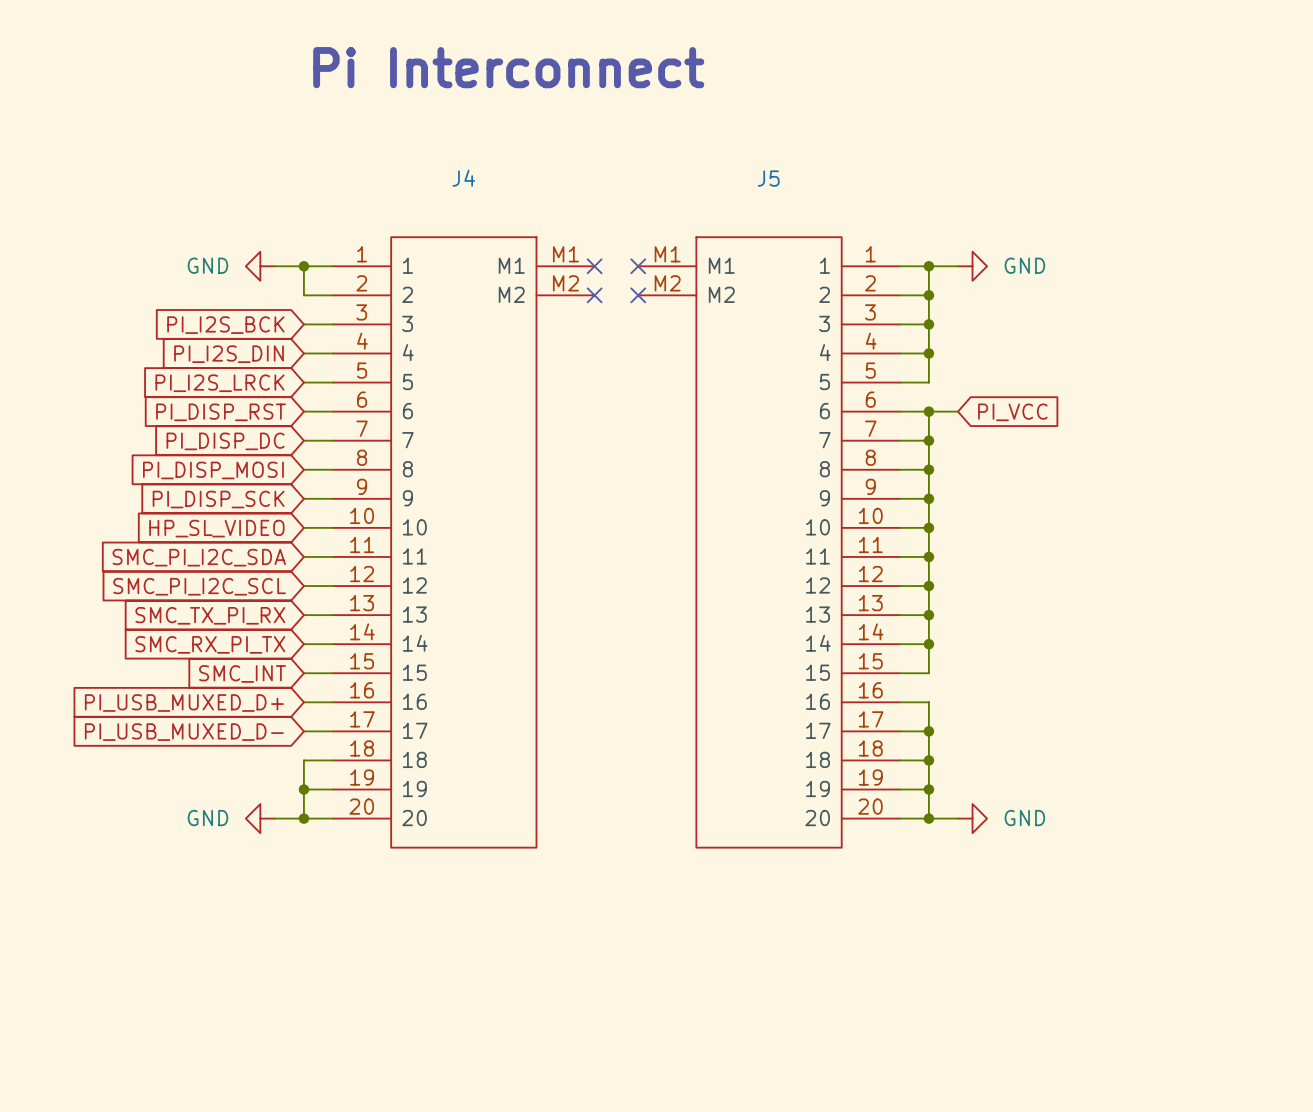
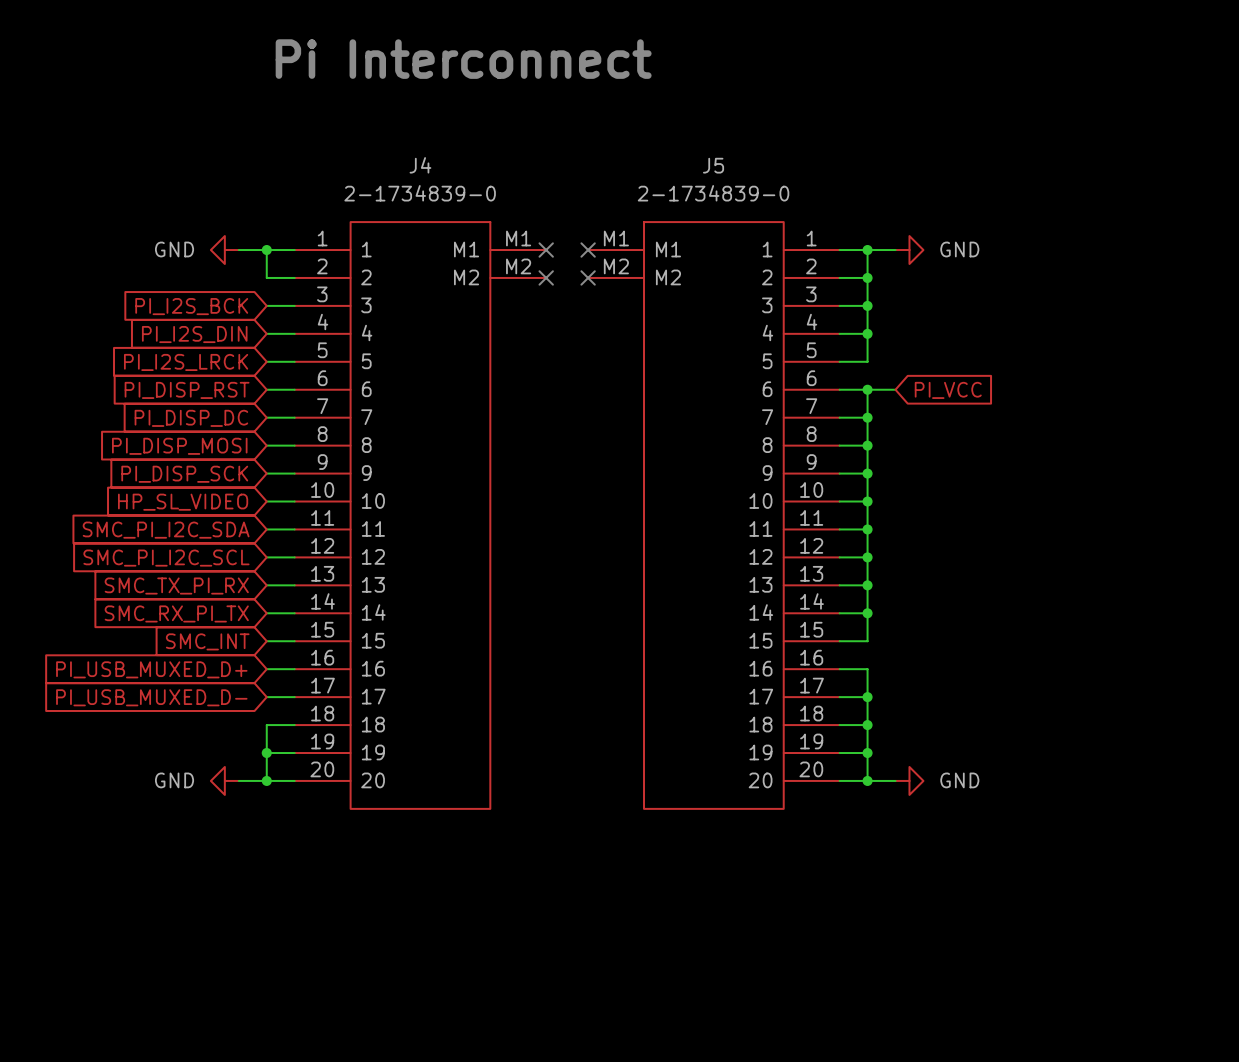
J4 value: none -> 2-1734839-0 (420, 193)
J5 value: none -> 2-1734839-0 (713, 193)

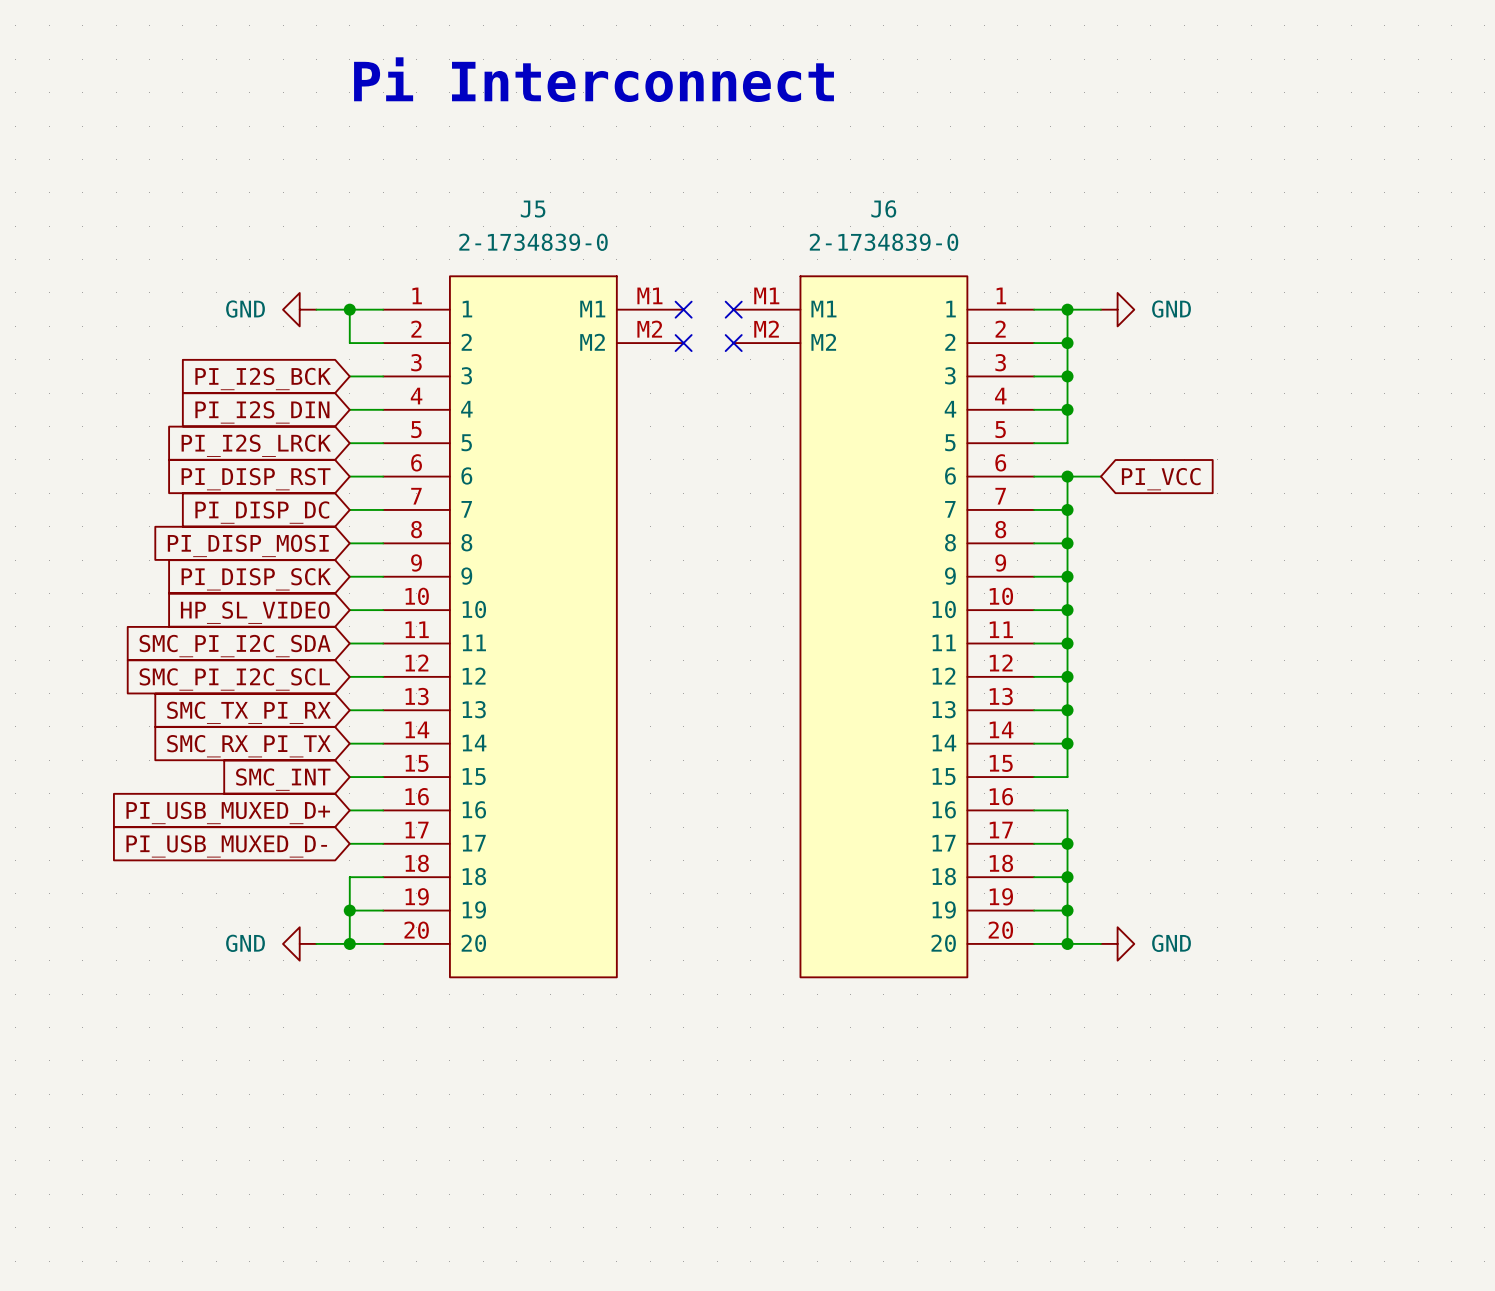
J5 symbol: [588, 222, 840, 809] -> [383, 276, 684, 978]
J4: 2-1734839-0 (420, 515) -> none
J6: none -> 2-1734839-0 (883, 626)

